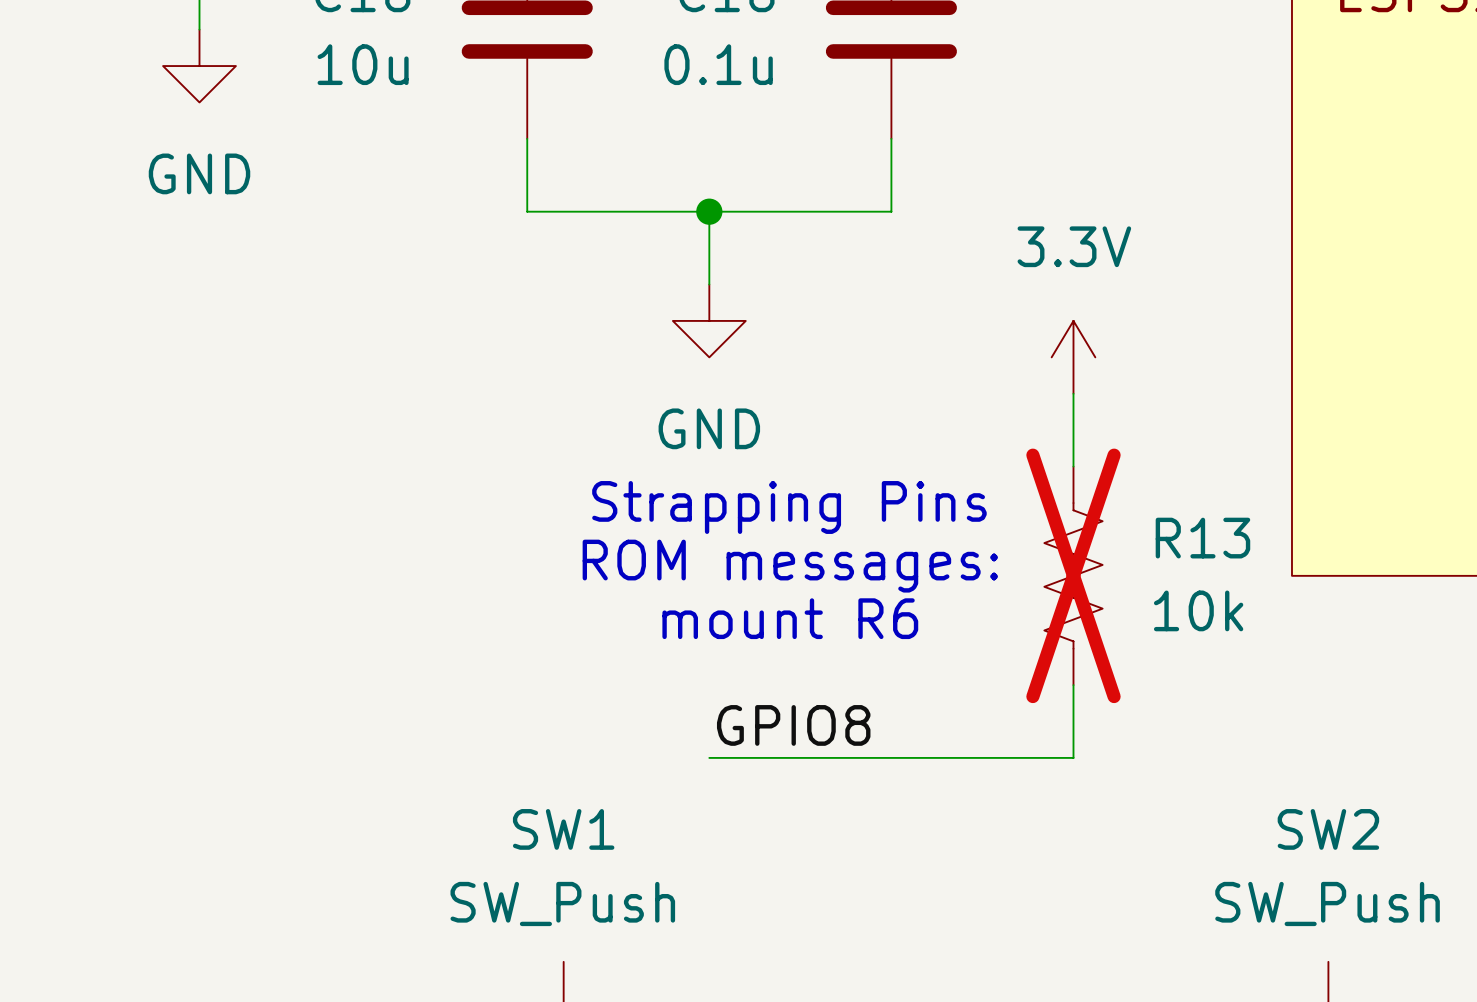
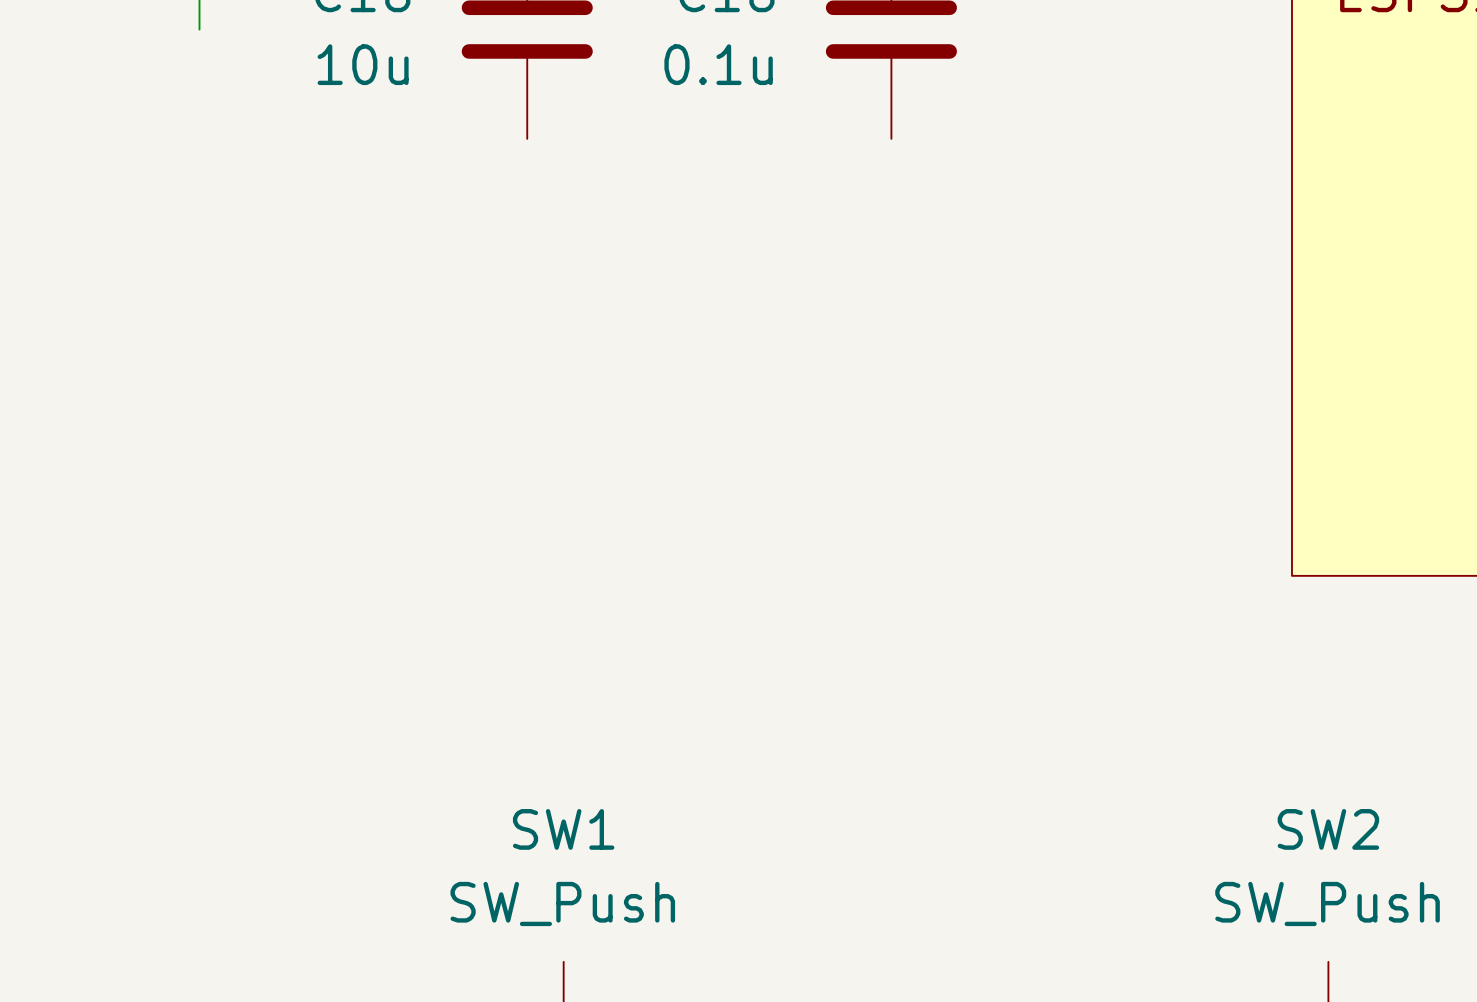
power symbol: GND (199, 66) -> none
wire: (527, 138) (527, 211) (891, 211) (891, 138) -> none
wire: (709, 211) (709, 284) -> none
junction: (709, 211) -> none
power symbol: GND (709, 320) -> none
power symbol: 3.3V (1073, 357) -> none
wire: (1073, 393) (1073, 466) -> none
text: Strapping Pins (789, 507) -> none
text: ROM messages: (790, 566) -> none
R13: 10k (1073, 575) -> none
text: mount R6 (790, 618) -> none
wire: (1073, 685) (1073, 757) (709, 757) -> none
label: GPIO8 (793, 725) -> none

